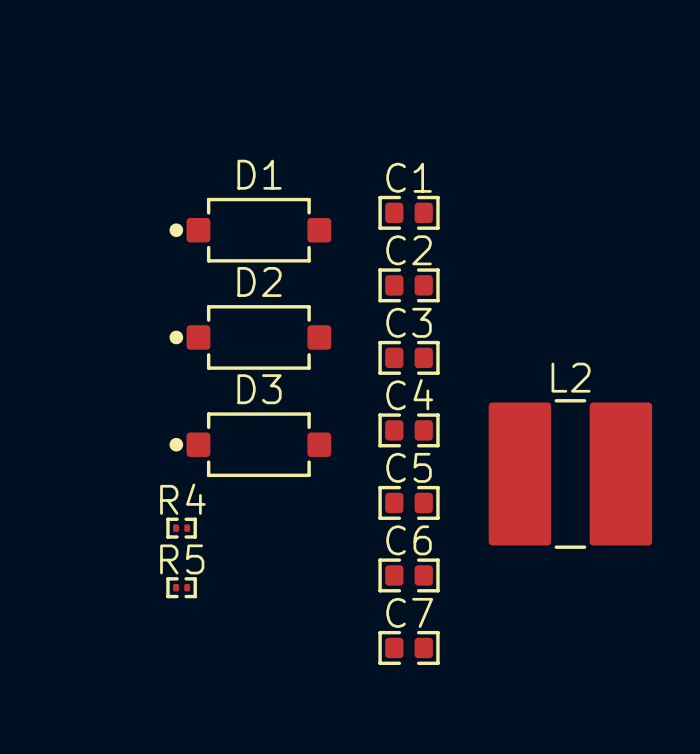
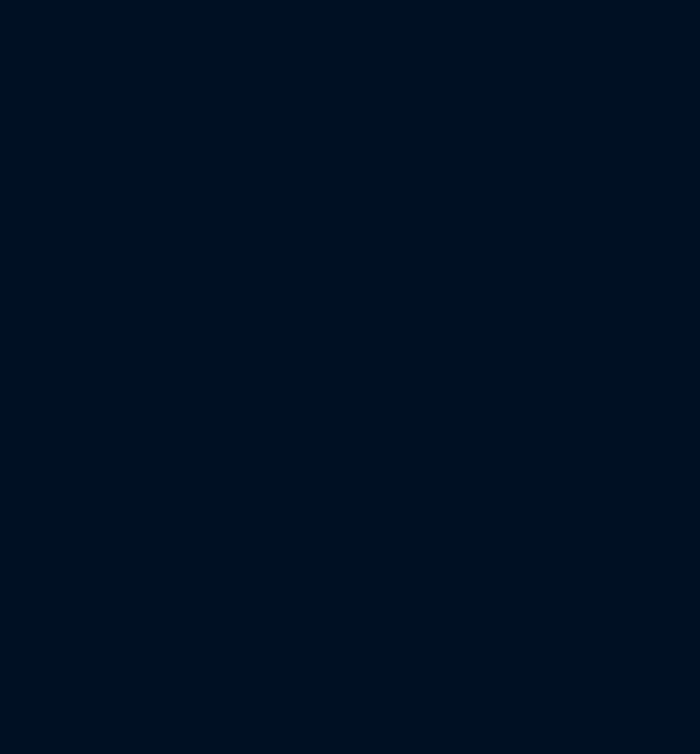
C1: (409, 212) -> none
D1: (250, 230) -> none
C2: (409, 285) -> none
D2: (250, 337) -> none
C3: (409, 357) -> none
C4: (409, 430) -> none
D3: (250, 444) -> none
L2: (570, 473) -> none
C5: (409, 502) -> none
R4: (181, 528) -> none
C6: (409, 575) -> none
R5: (181, 587) -> none
C7: (409, 647) -> none

